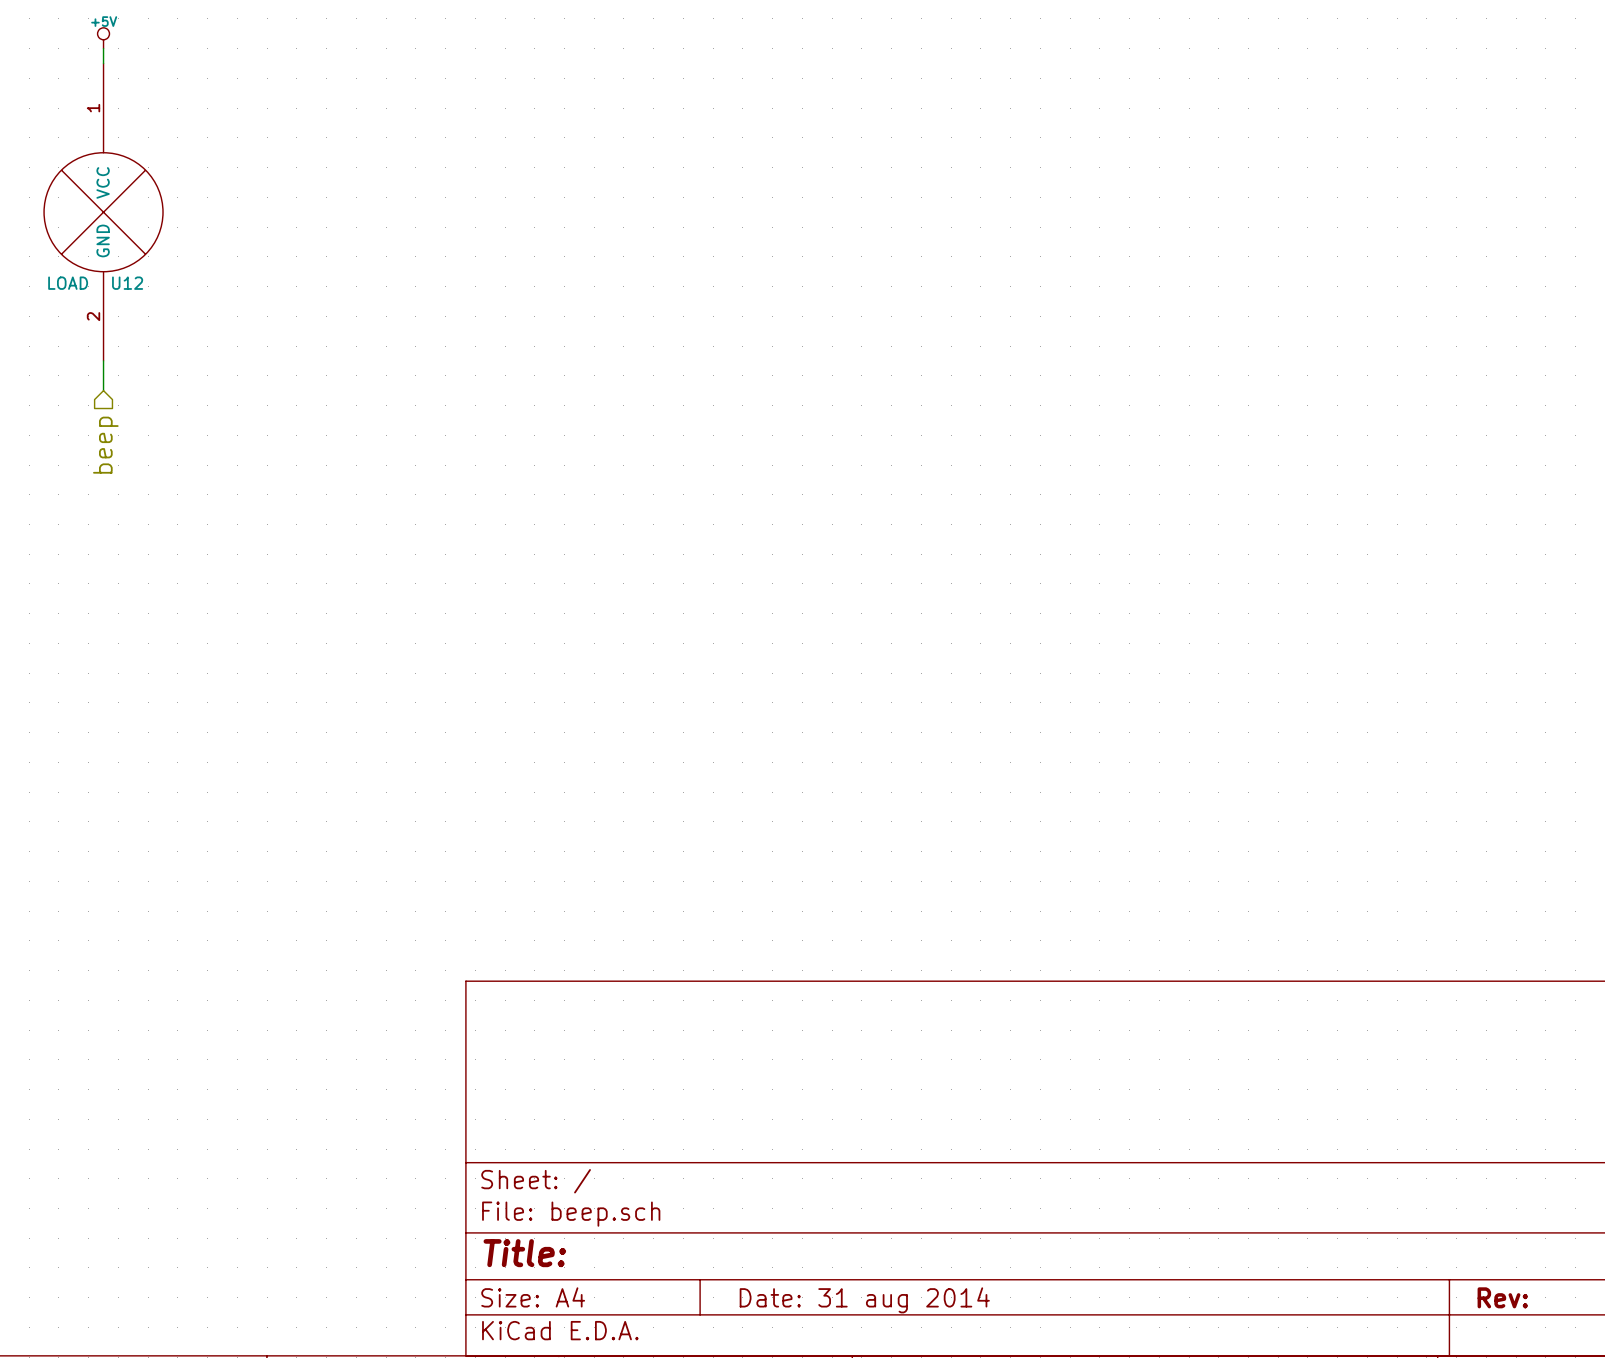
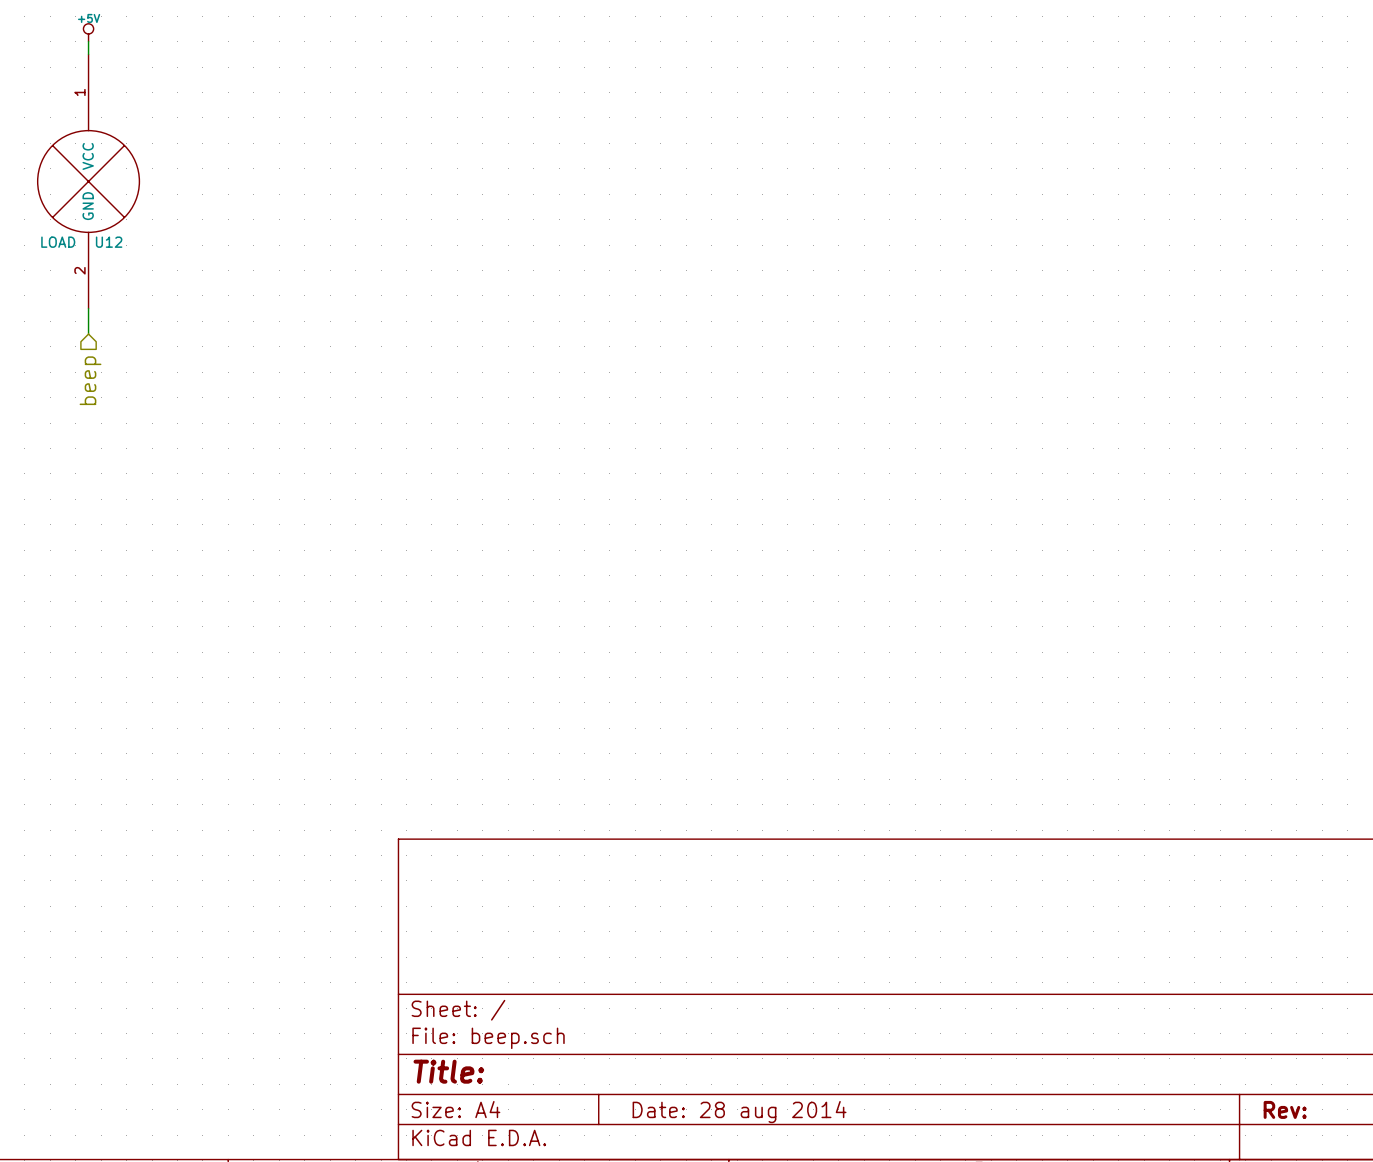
title block: Date: 31 aug 2014 (864, 1300) -> Date: 28 aug 2014 (739, 1112)

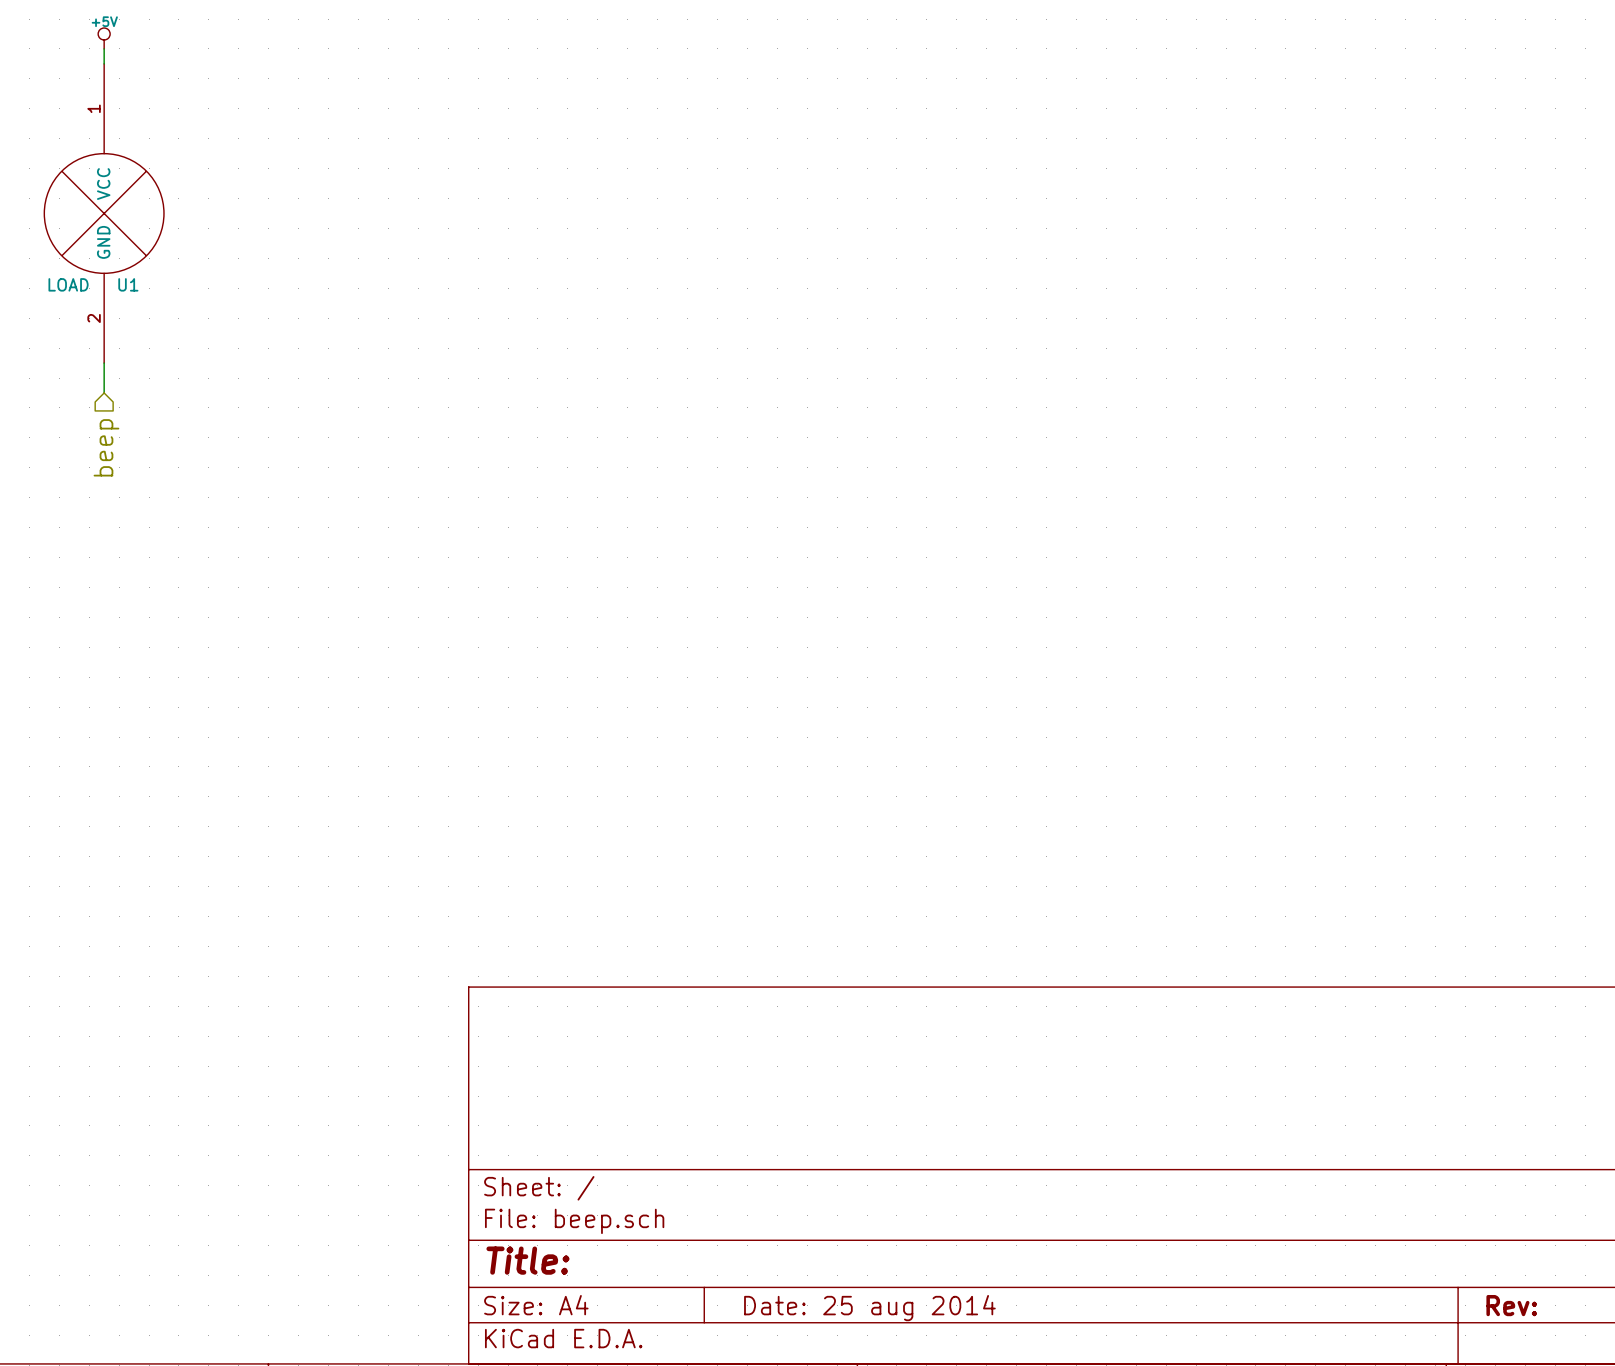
U12 name: U12 (109, 242) -> U1 (128, 284)
title block: Date: 28 aug 2014 (739, 1112) -> Date: 25 aug 2014 (869, 1308)

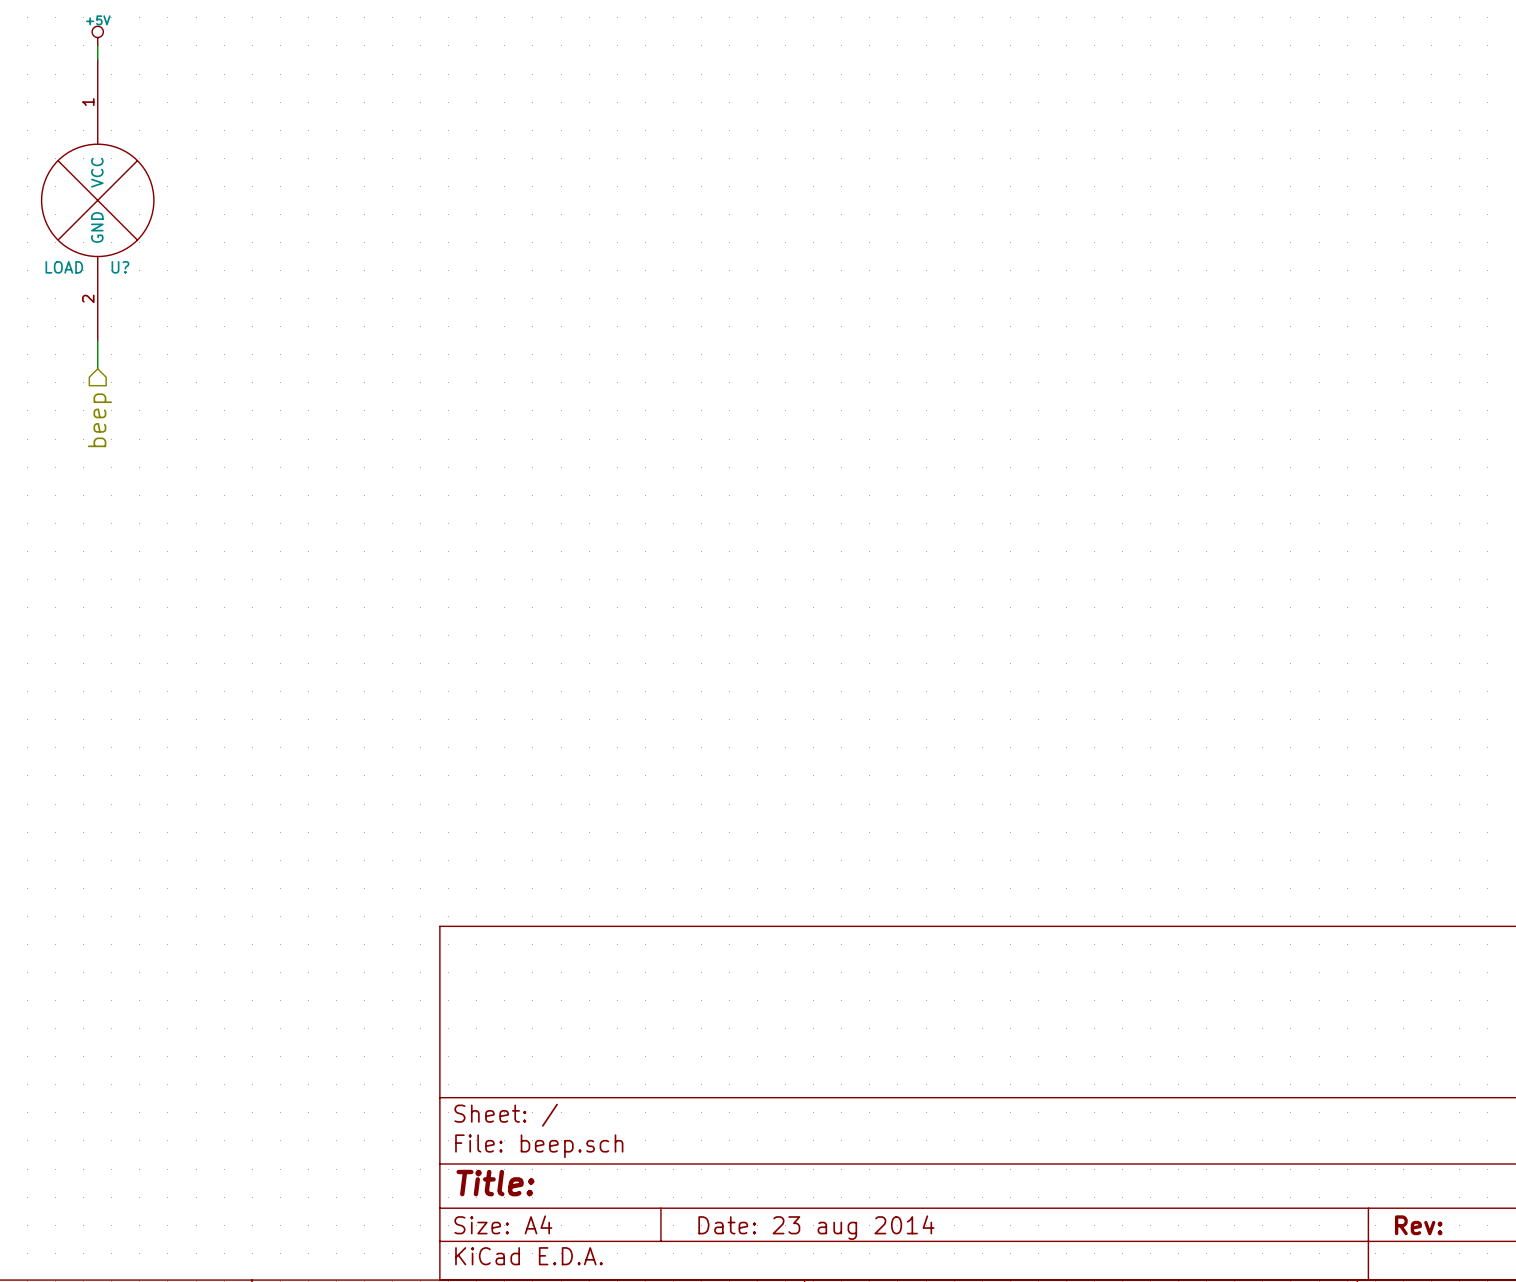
U1 name: U1 (128, 284) -> U? (120, 267)
title block: Date: 25 aug 2014 (869, 1308) -> Date: 23 aug 2014 (816, 1227)

